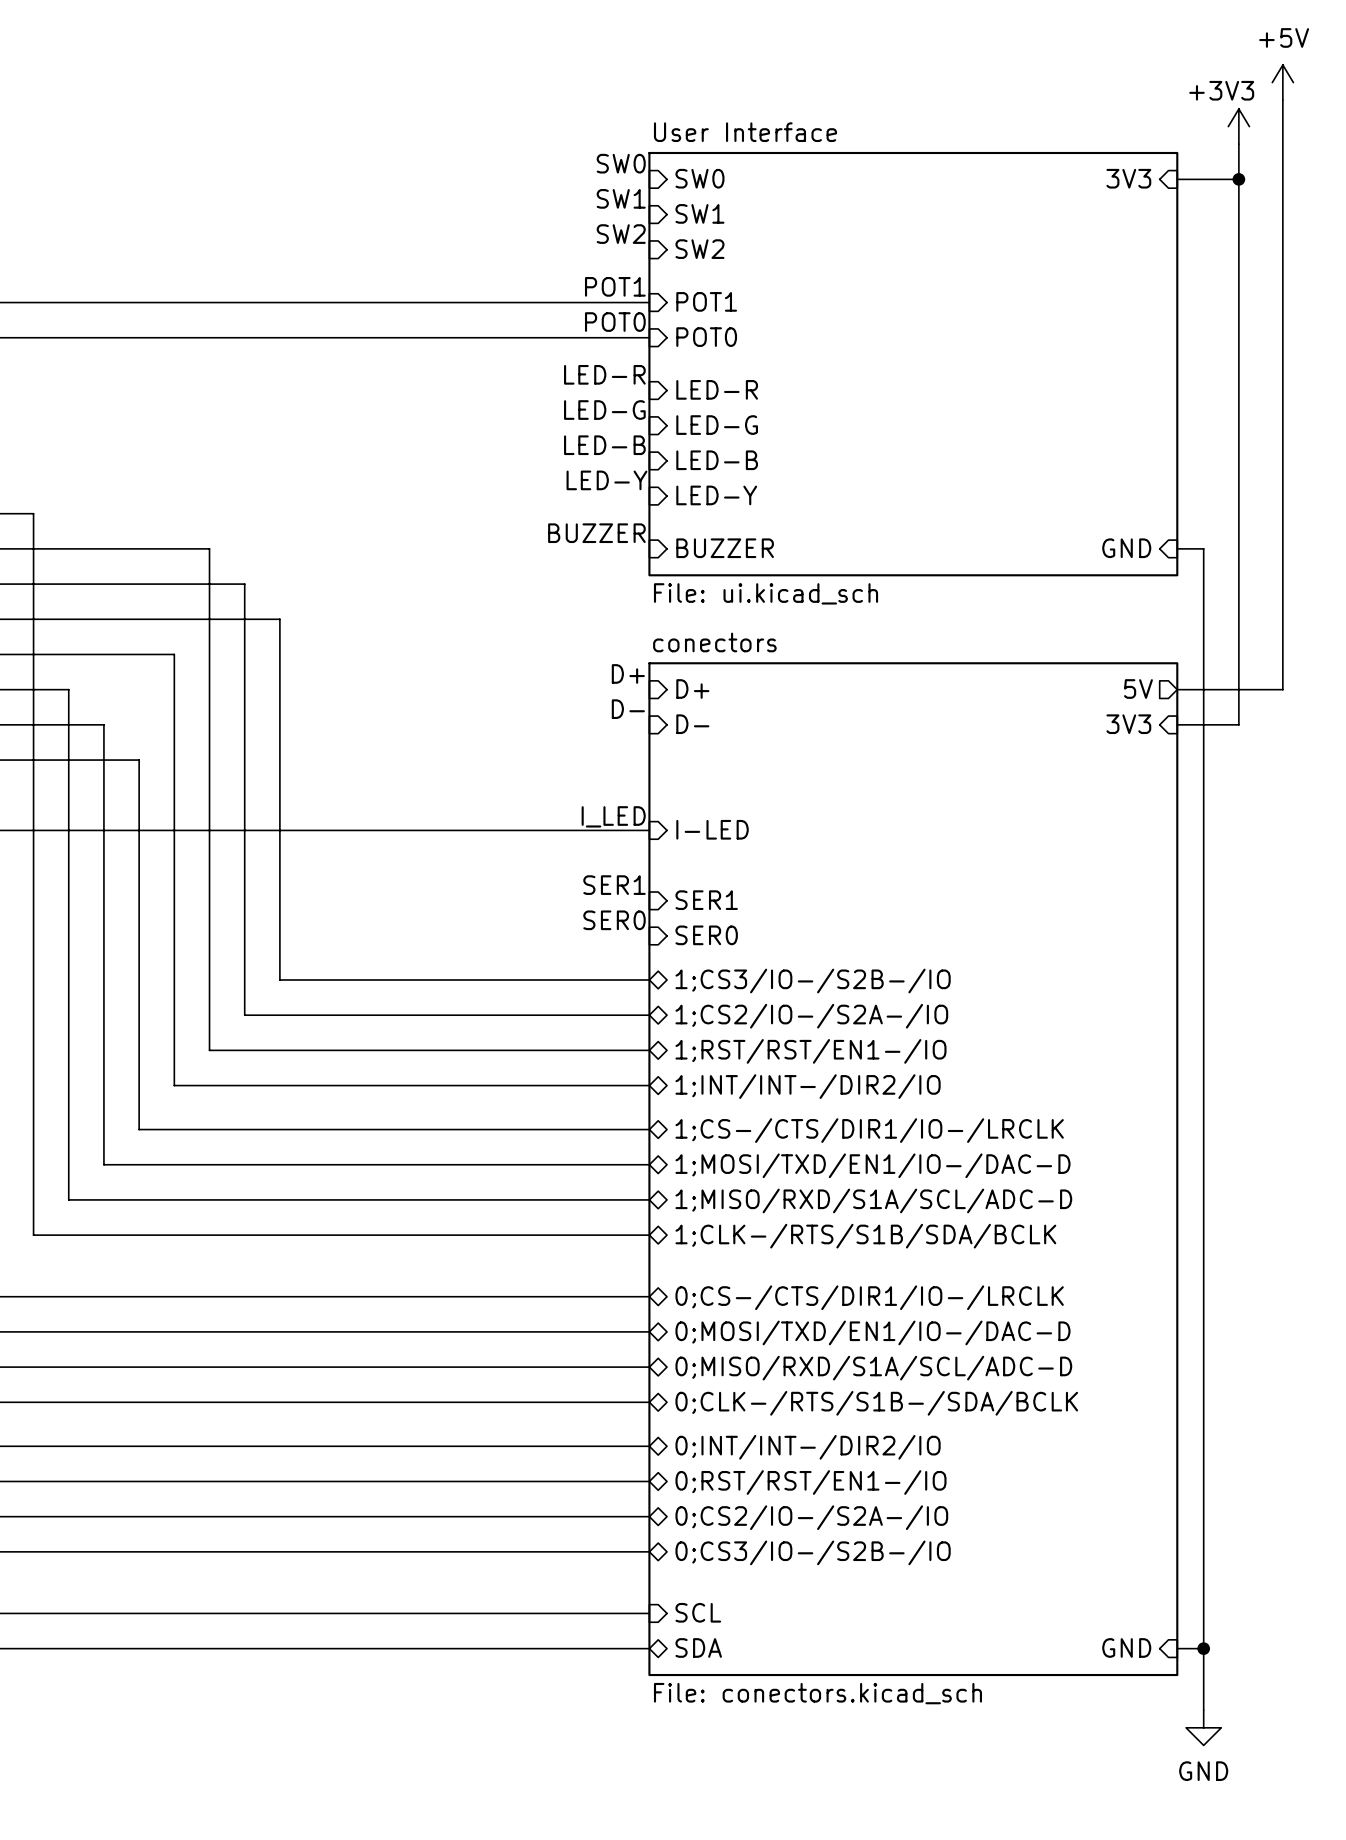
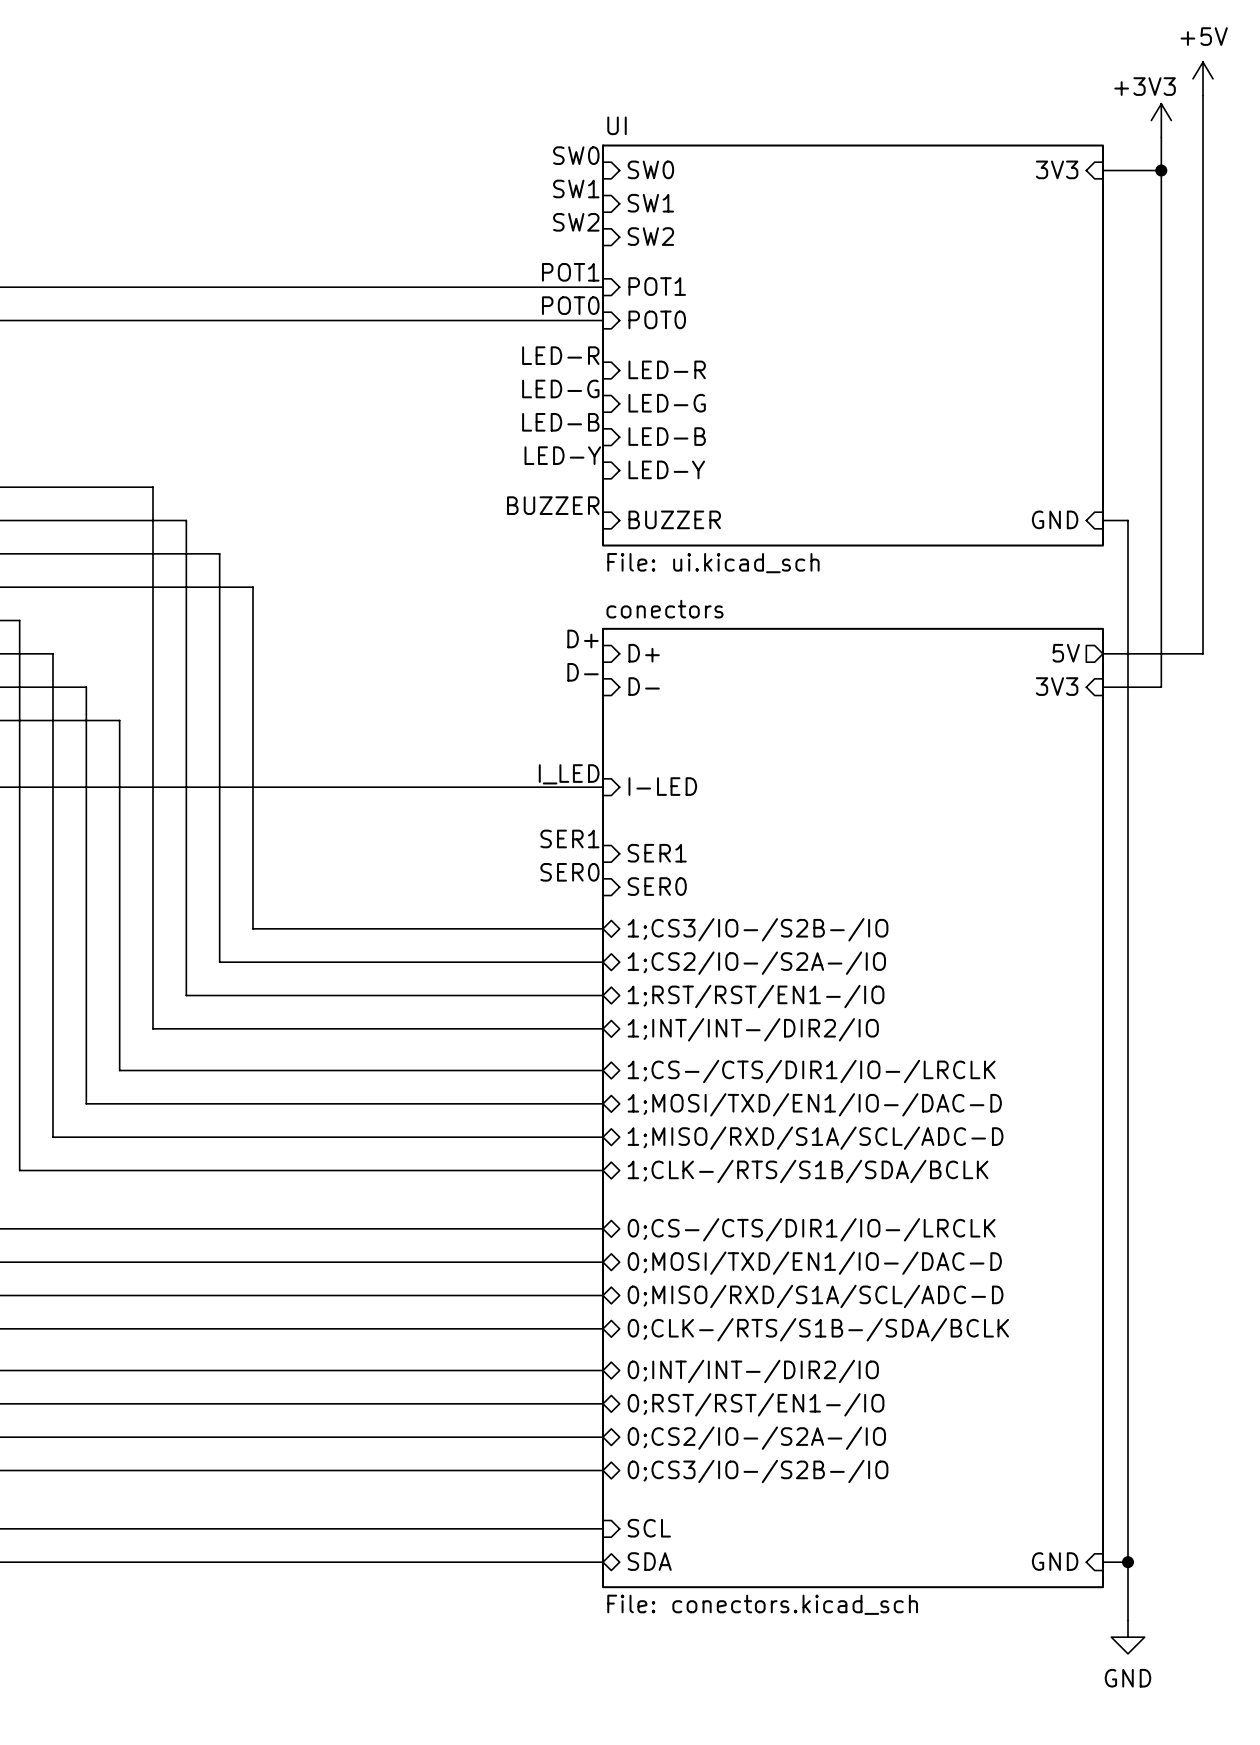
sheet User Interface name: User Interface (745, 132) -> UI (617, 125)
wire: (33, 513) (33, 654) (174, 654) -> (19, 487) (153, 487) (153, 620)

